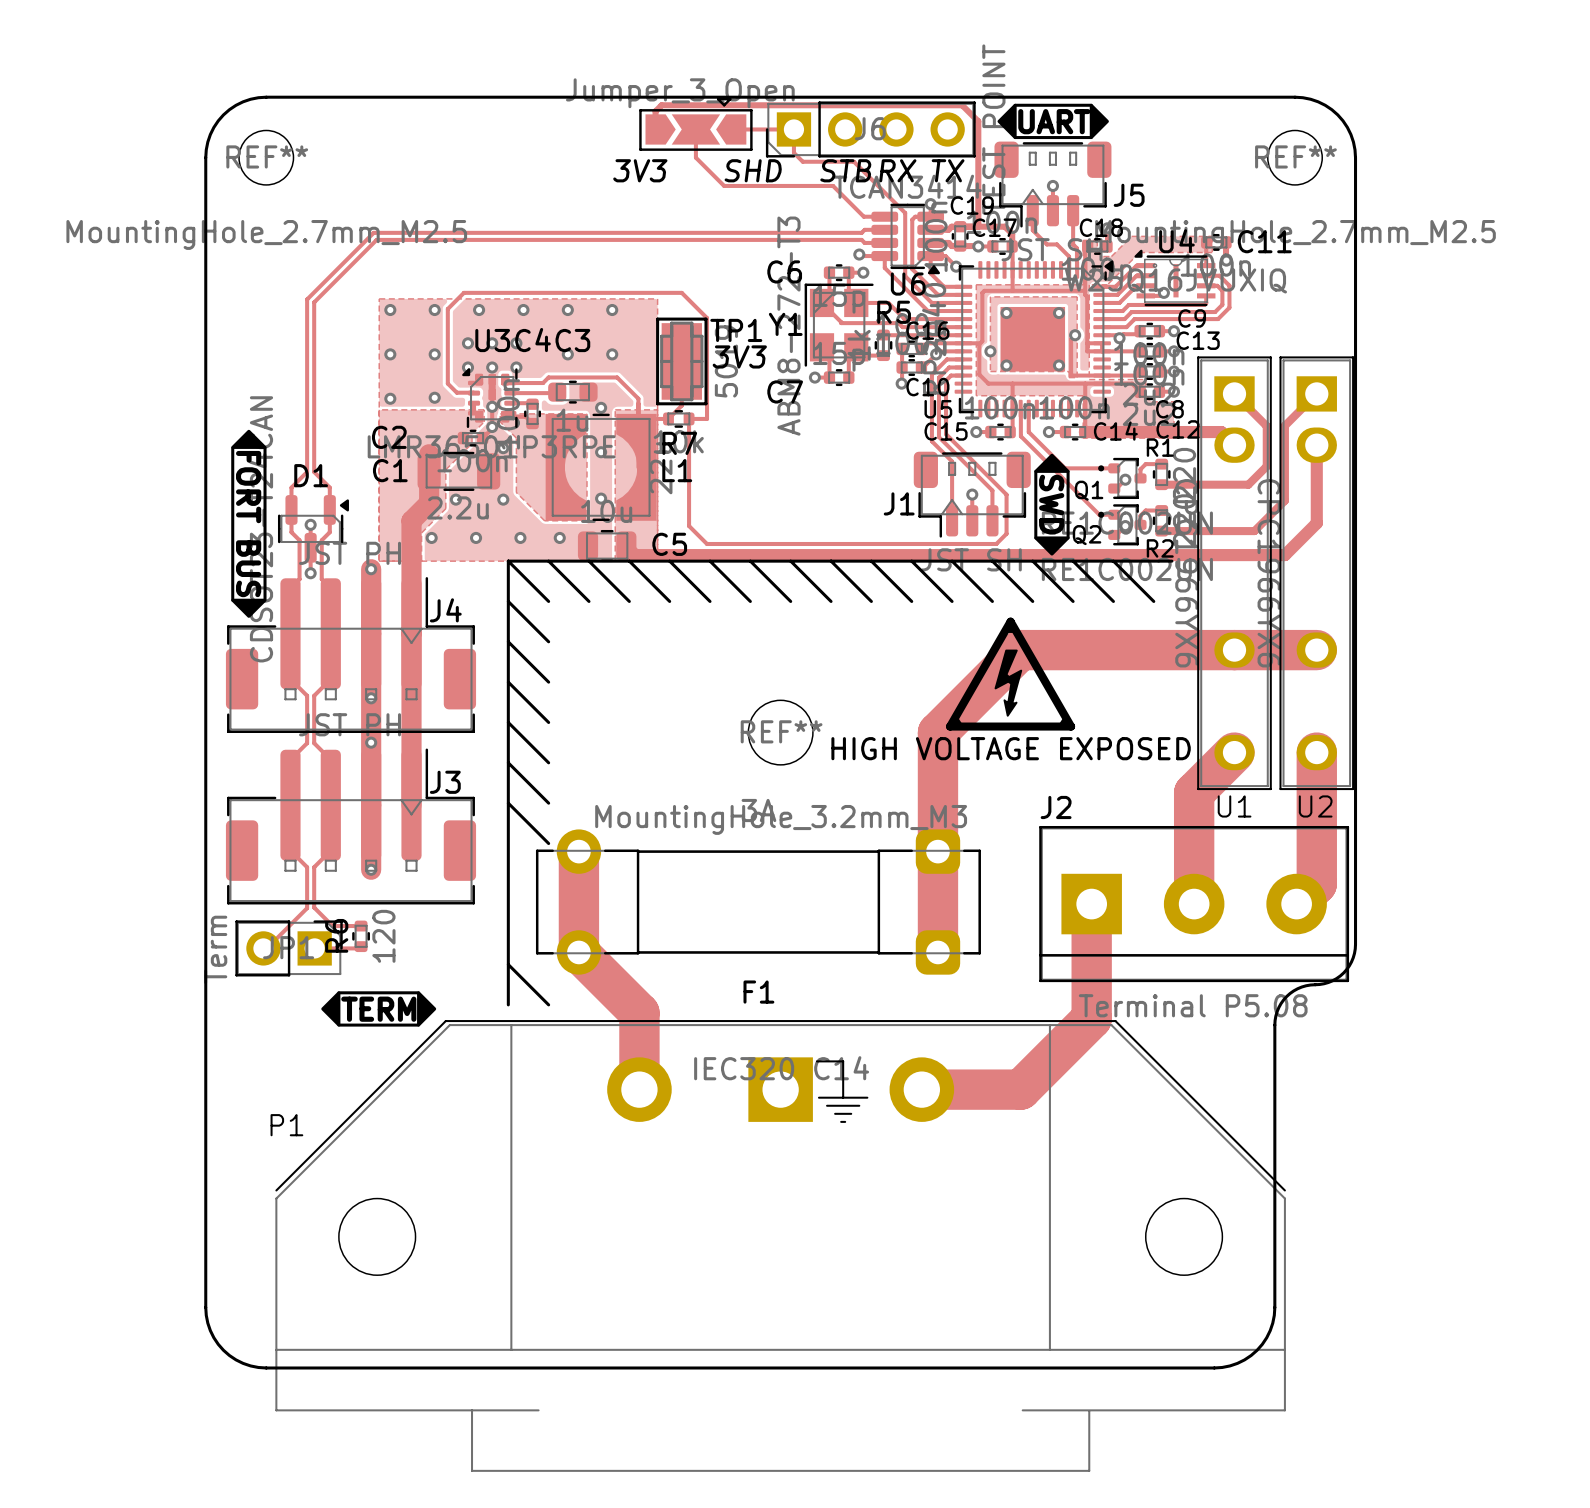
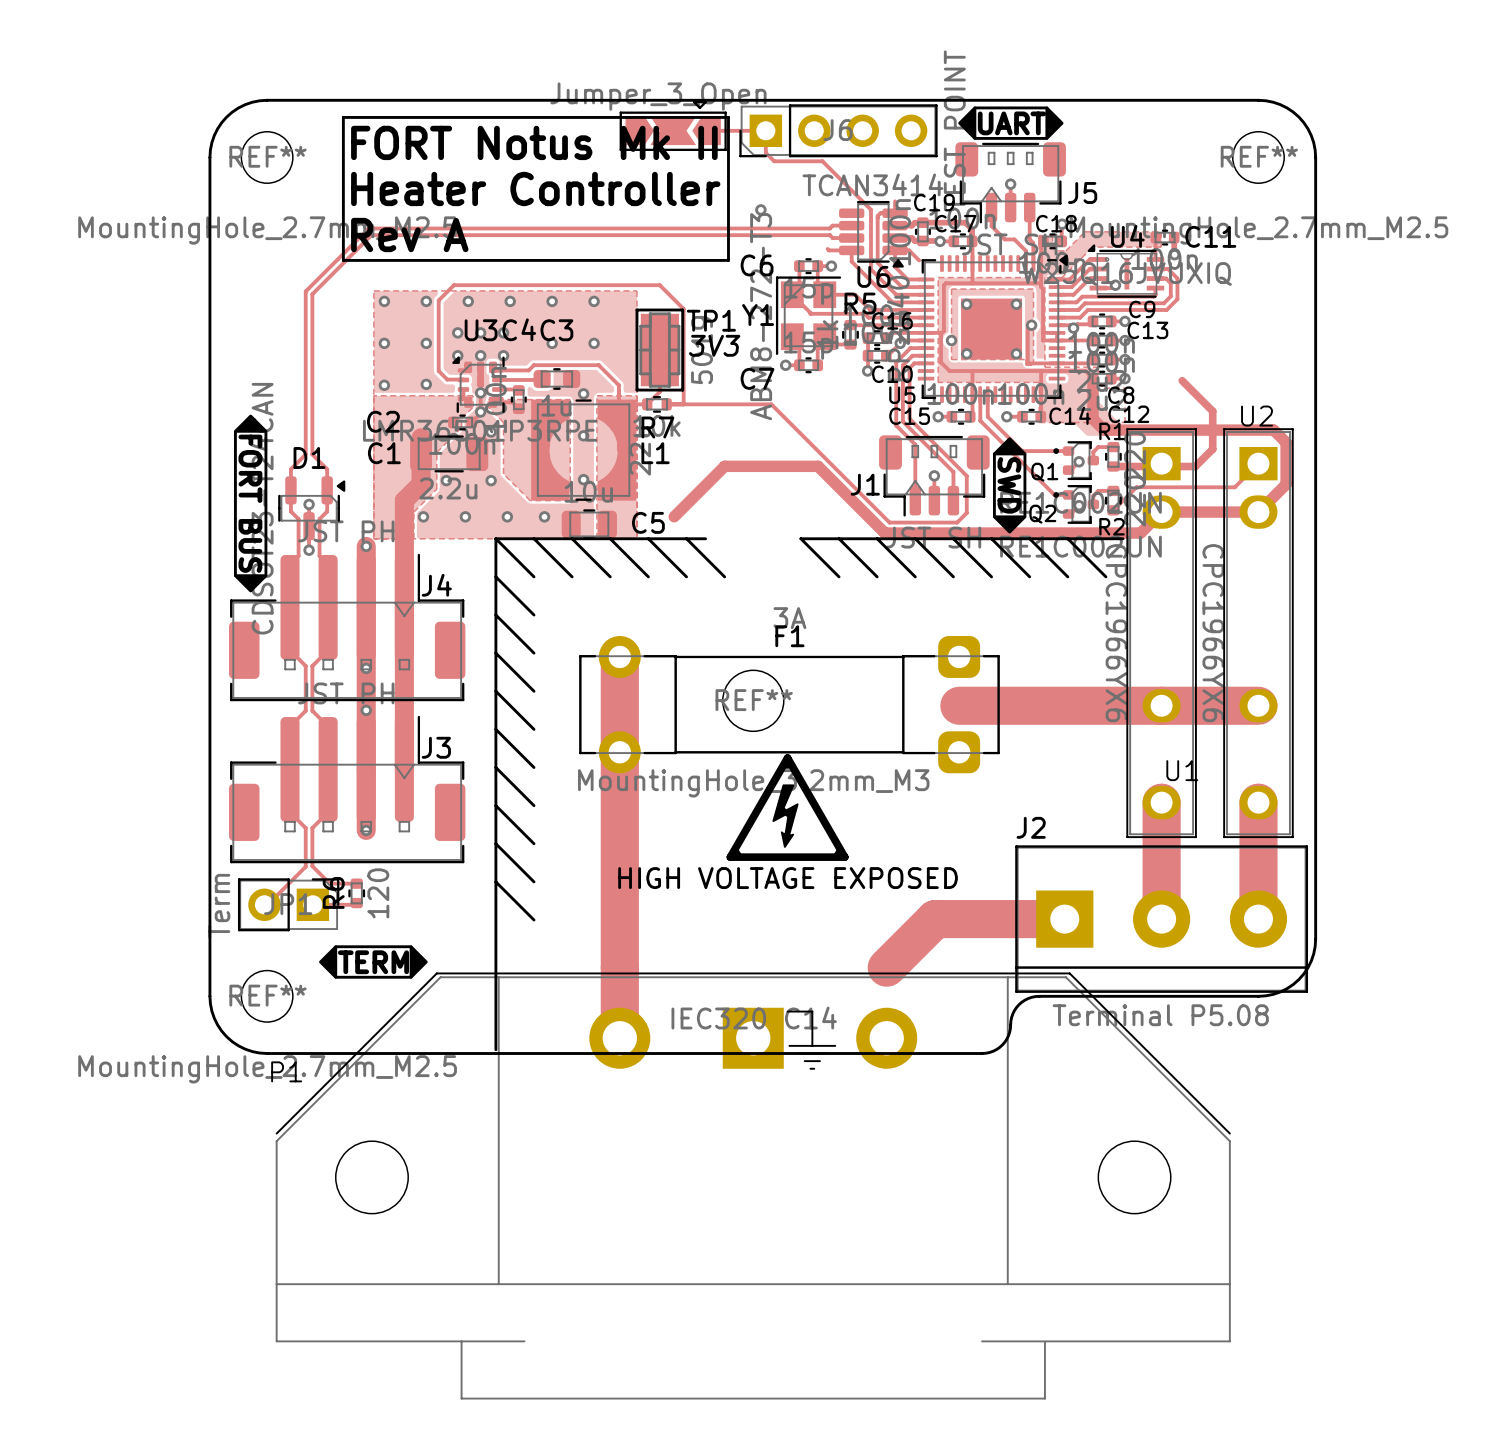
board edge: (1295, 97) (1310, 99) (1331, 109) (1347, 127) (1355, 149) (1355, 944) (1353, 957) (1343, 972) (1328, 982) (1306, 985) (1293, 990) (1283, 999) (1275, 1016) (1274, 1315) (1266, 1337) (1251, 1355) (1229, 1365) (1214, 1367) (266, 1367) (250, 1365) (229, 1355) (218, 1344) (210, 1330) (206, 1315) (205, 1045) -> (1239, 100) (1273, 102) (1293, 112) (1303, 122) (1311, 135) (1315, 157) (1315, 939) (1311, 961) (1303, 973) (1293, 984) (1273, 994) (1258, 996) (1031, 997) (1021, 1002) (1014, 1010) (1008, 1035) (1002, 1045) (992, 1051) (982, 1053) (259, 1053) (238, 1045) (221, 1031) (211, 1011) (209, 996)
line: none -> (343, 117) (728, 117) (728, 260) (343, 260) (343, 117)
track: (655, 129) (655, 111) (661, 105) (962, 105) (978, 121) (978, 226) -> none
track: (695, 129) (695, 157) (724, 185) (833, 185) (863, 216) (884, 216) -> none
text: none -> FORT Notus Mk II (534, 142)
REF** position: (1295, 157) -> (1258, 157)
text: 3V3 (640, 170) -> none
text: SHD (753, 170) -> none
text: STB (845, 170) -> none
text: RX (897, 170) -> none
text: TX (948, 170) -> none
text: none -> Heater Controller (535, 188)
via: (930, 204) -> none
via: none -> (760, 209)
text: none -> Rev A (409, 235)
via: (859, 254) -> none
via: (956, 266) -> none
track: (1316, 393) (1284, 425) (1284, 500) (1254, 531) (1161, 531) -> (1258, 463) (1234, 487) (1136, 487) (1113, 510)
track: (689, 418) (689, 526) (707, 543) (924, 543) -> (683, 404) (771, 404) (889, 522)
track: (1084, 432) (1221, 432) (1234, 445) -> none
track: (1316, 445) (1316, 523) (1284, 555) (1190, 555) -> (1092, 378) (1092, 419) (1104, 430) (1273, 430) (1286, 442) (1286, 484) (1258, 512) (1161, 512) (1140, 533)
track: (626, 546) (635, 555) (919, 555) -> (674, 516) (724, 466) (818, 466) (884, 533)
line: (730, 561) (831, 561) -> none
line: (750, 561) (790, 601) -> (495, 805) (534, 843)
line: (790, 561) (831, 601) -> (495, 843) (534, 881)
U1 position: (1234, 573) -> (1161, 633)
U2 position: (1316, 573) -> (1258, 633)
track: (1316, 650) (1020, 650) (937, 732) (937, 952) -> none
drawing position: (1010, 674) -> (787, 807)
track: none -> (959, 705) (1258, 705)
text position: HIGH VOLTAGE EXPOSED (1011, 748) -> HIGH VOLTAGE EXPOSED (788, 878)
track: (1234, 752) (1194, 792) (1194, 904) -> none
track: (1316, 752) (1316, 883) (1296, 904) -> none
U2 name position: U2 (1315, 806) -> U2 (1257, 416)
track: none -> (1161, 802) (1161, 919)
track: none -> (1258, 802) (1258, 919)
track: (578, 851) (578, 952) (639, 1012) -> (619, 656) (619, 965)
F1 position: (758, 902) -> (789, 704)
track: (1091, 904) (1091, 1018) (1020, 1089) (921, 1089) -> none
J2 position: (1194, 904) -> (1161, 919)
track: none -> (1064, 919) (935, 919) (886, 967)
line: (508, 964) (548, 1004) -> (495, 881) (534, 920)
F1 name position: F1 (758, 992) -> F1 (789, 636)
line: none -> (495, 958) (495, 1049)
REF**: none -> MountingHole_2.7mm_M2.5 (267, 996)

